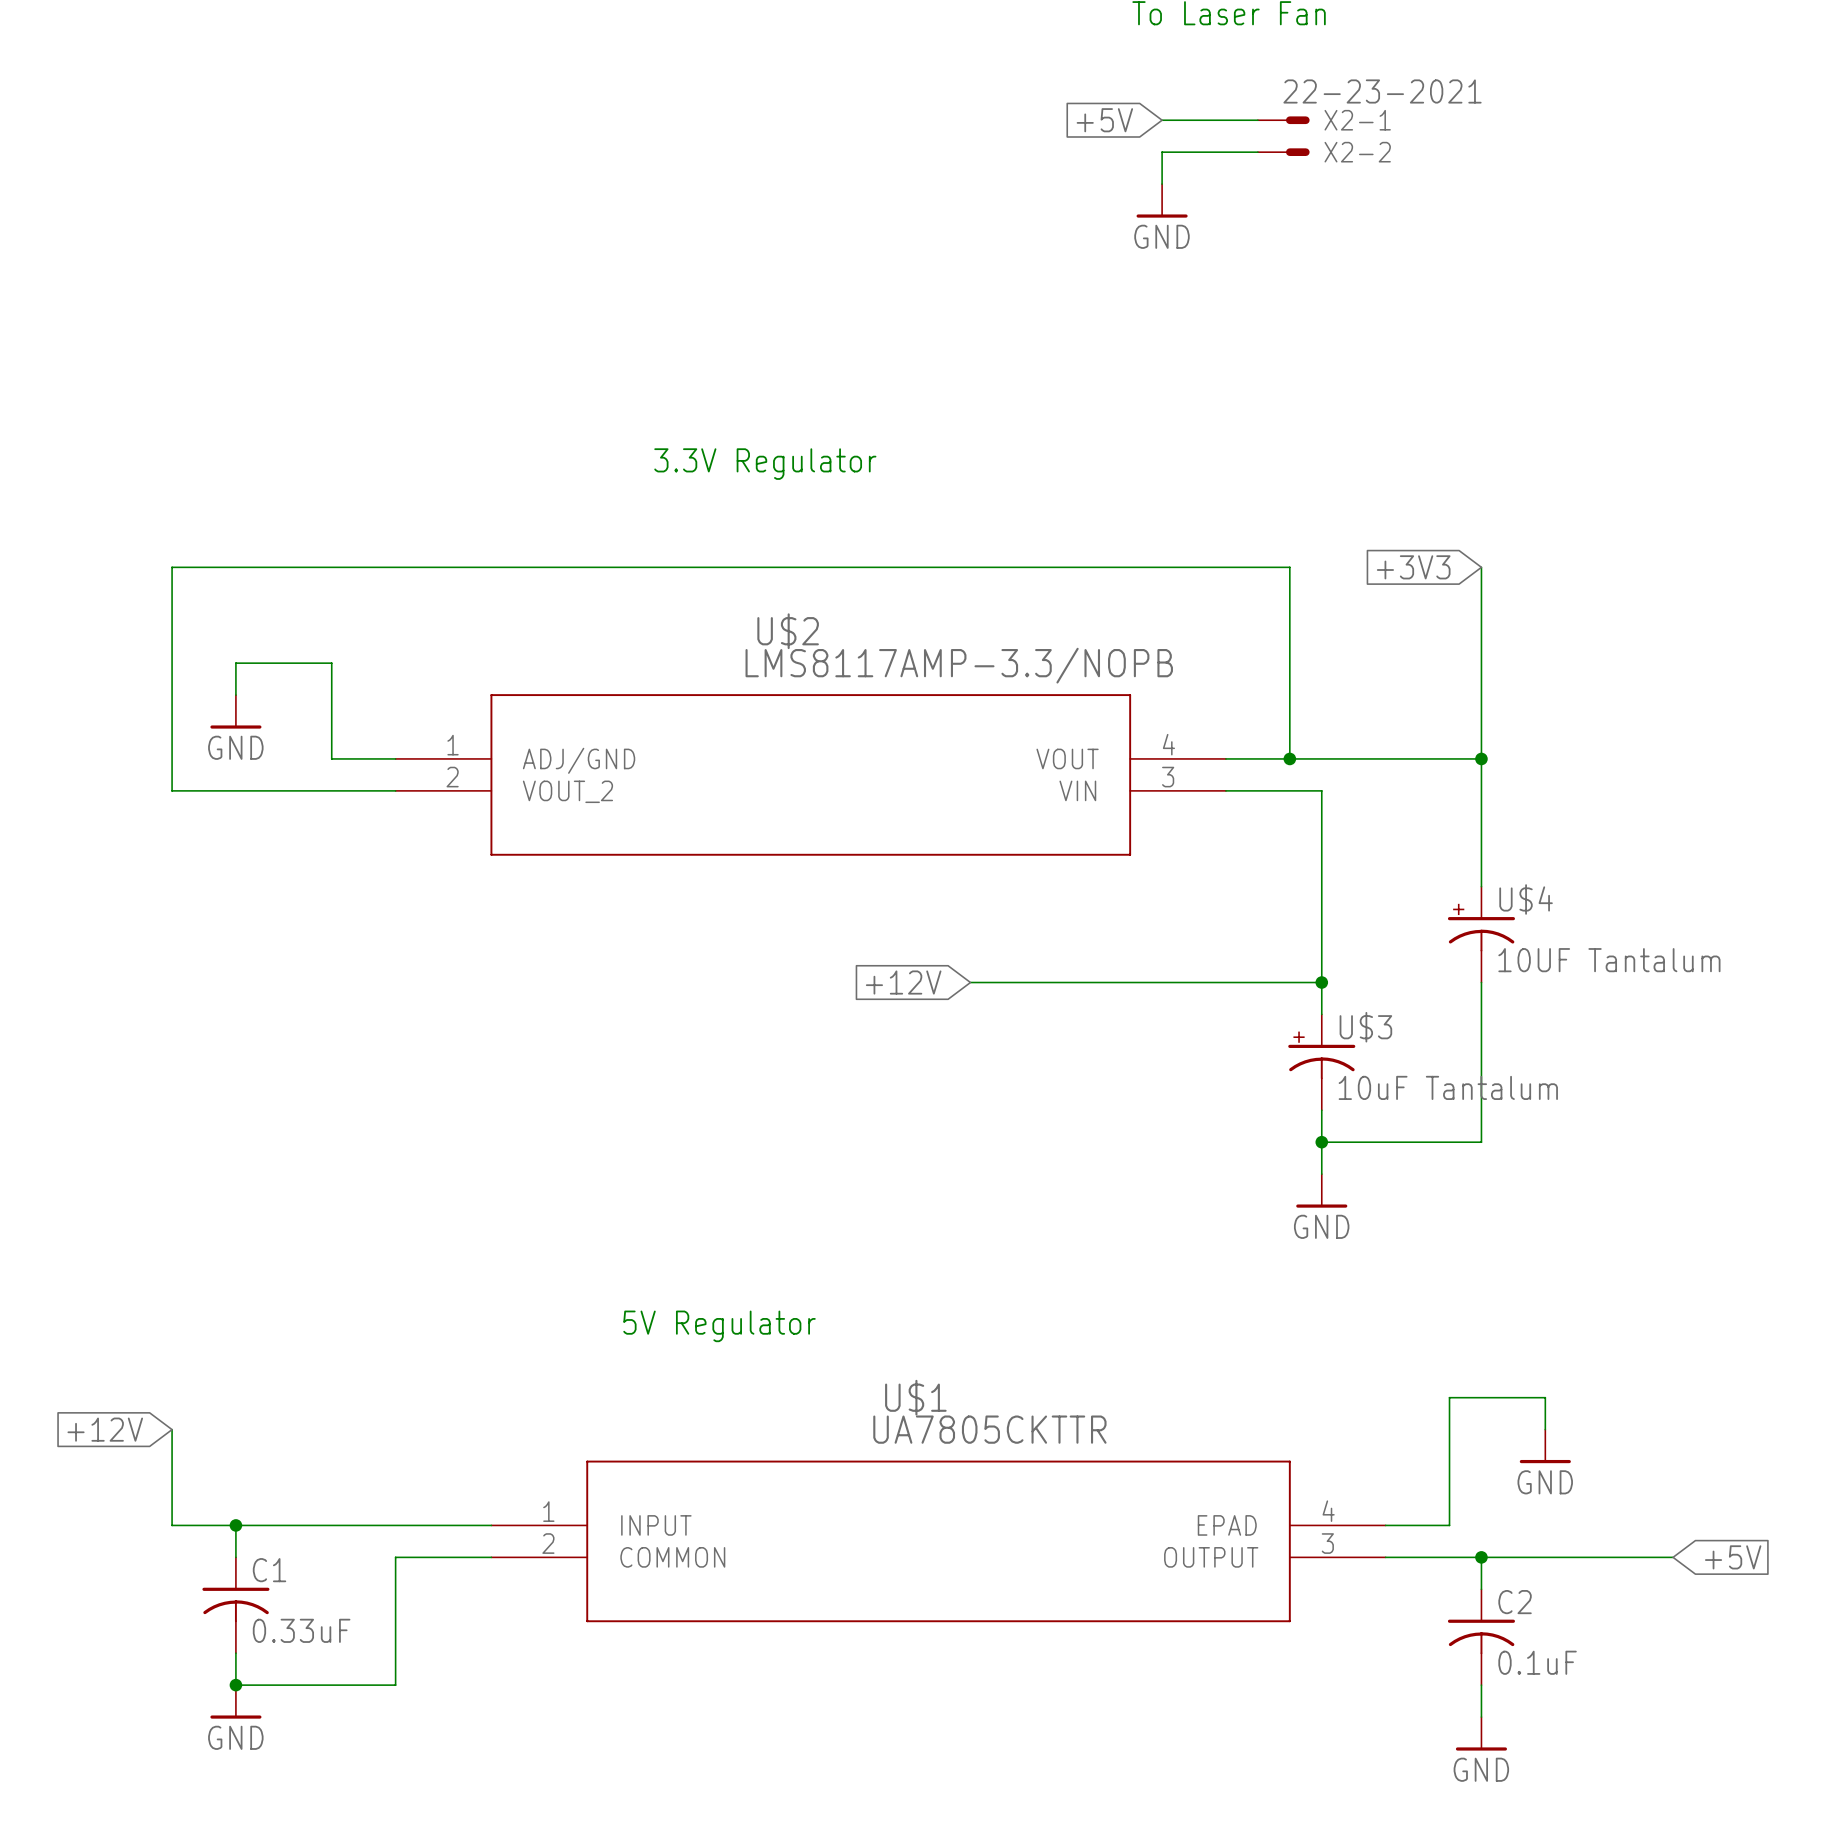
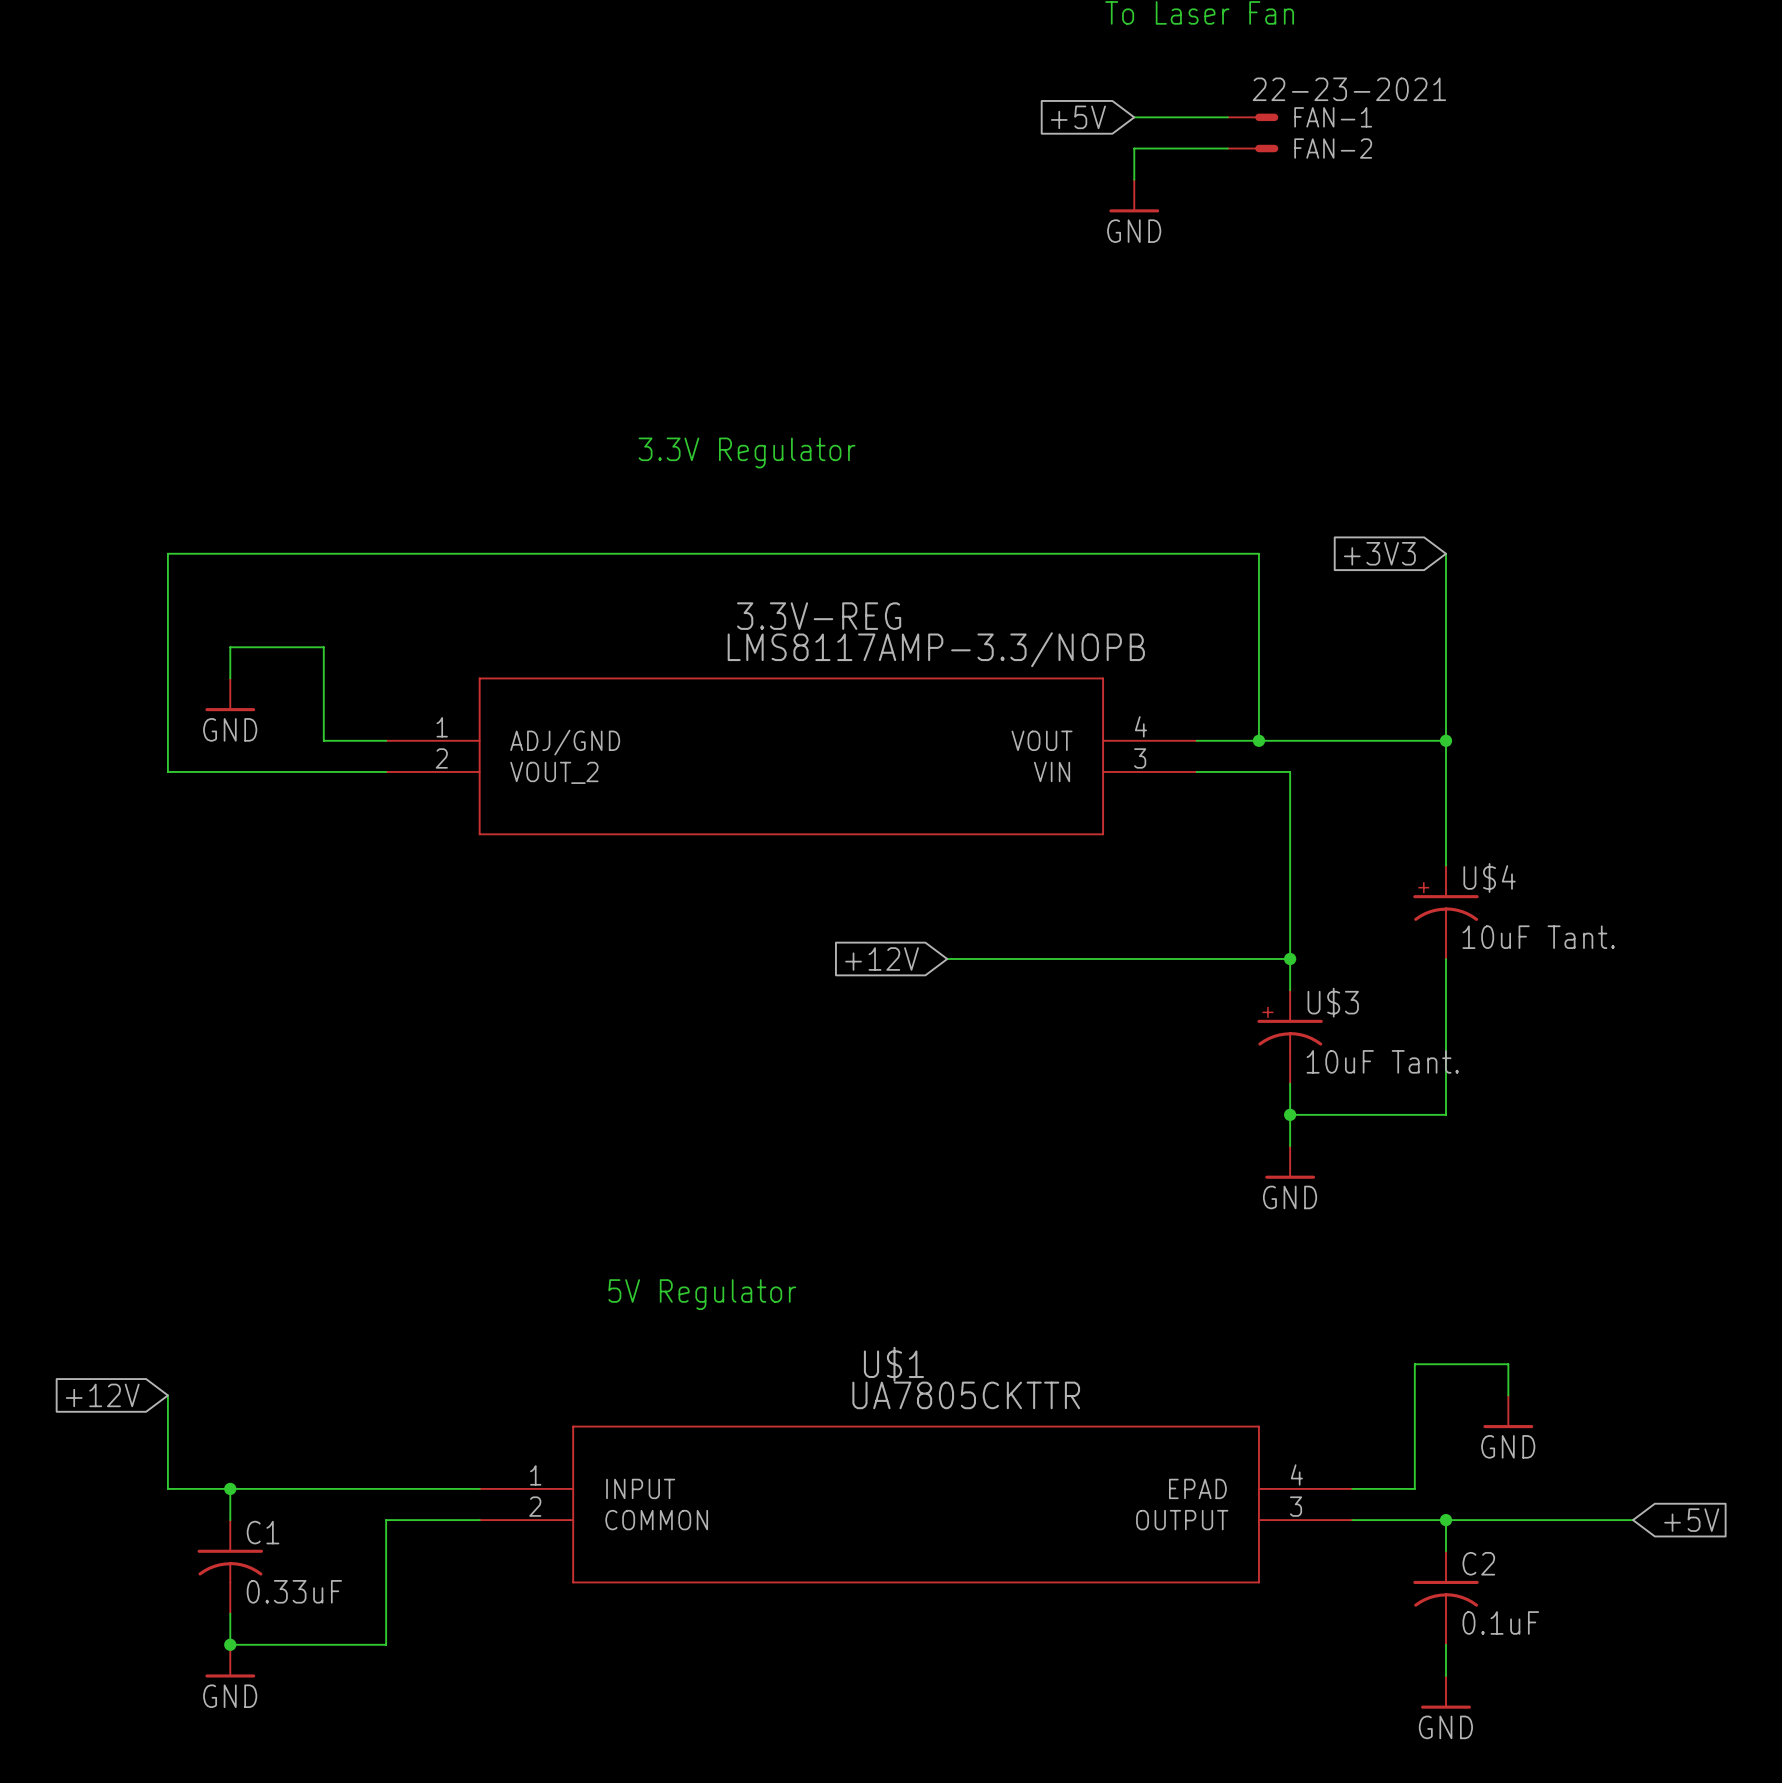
X2-1 name: X2-1 (1357, 120) -> FAN-1 (1333, 117)
X2-2 name: X2-2 (1357, 152) -> FAN-2 (1333, 148)
U$2 name: U$2 (788, 631) -> 3.3V-REG (819, 616)
U$4 value: 10UF Tantalum (1609, 960) -> 10uF Tant. (1538, 937)
U$3 value: 10uF Tantalum (1448, 1087) -> 10uF Tant. (1382, 1061)

